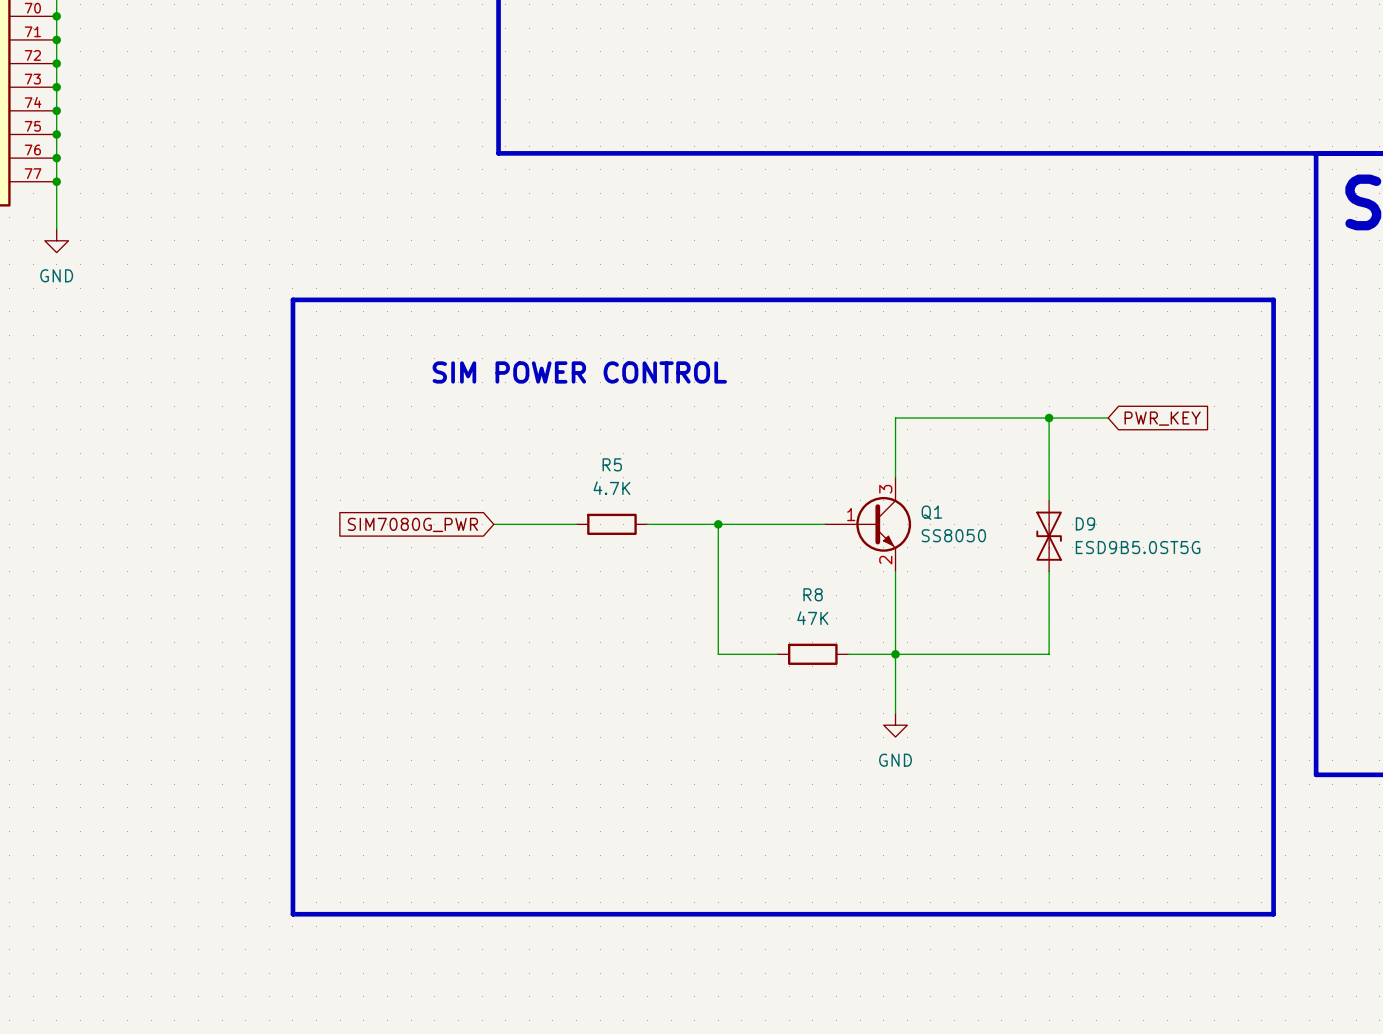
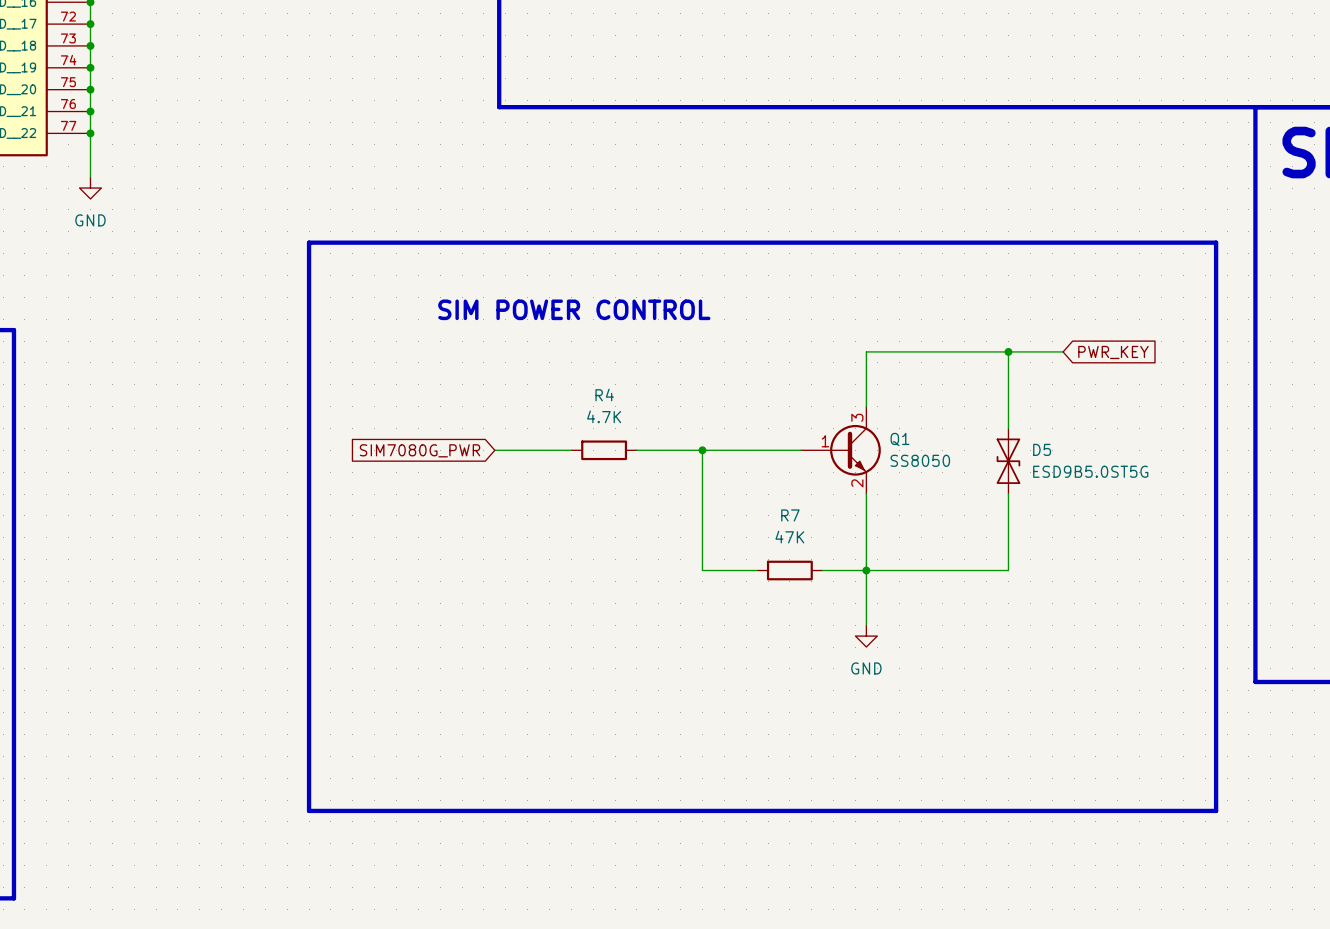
R5 name: R5 (612, 464) -> R4 (604, 394)
D9 name: D9 (1085, 523) -> D5 (1042, 449)
R8 name: R8 (813, 594) -> R7 (790, 515)

